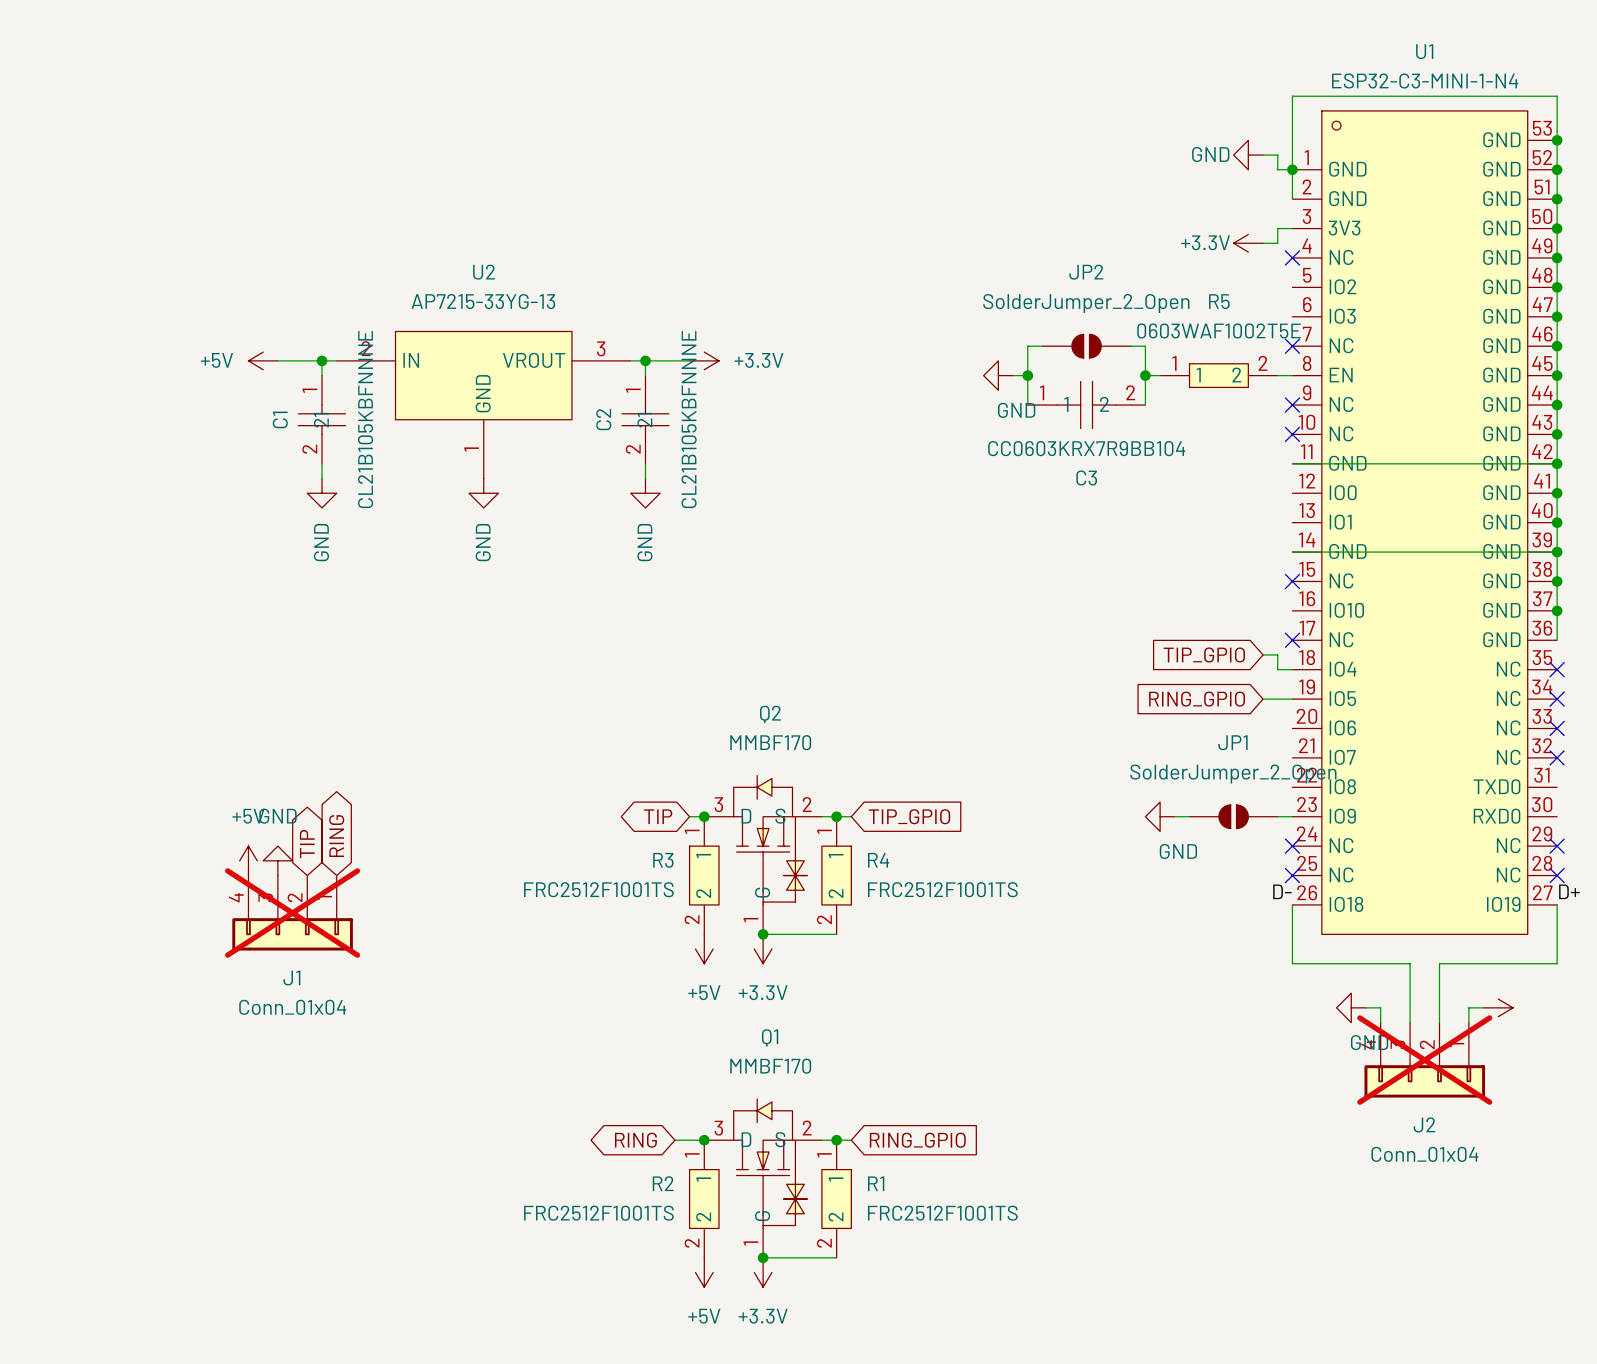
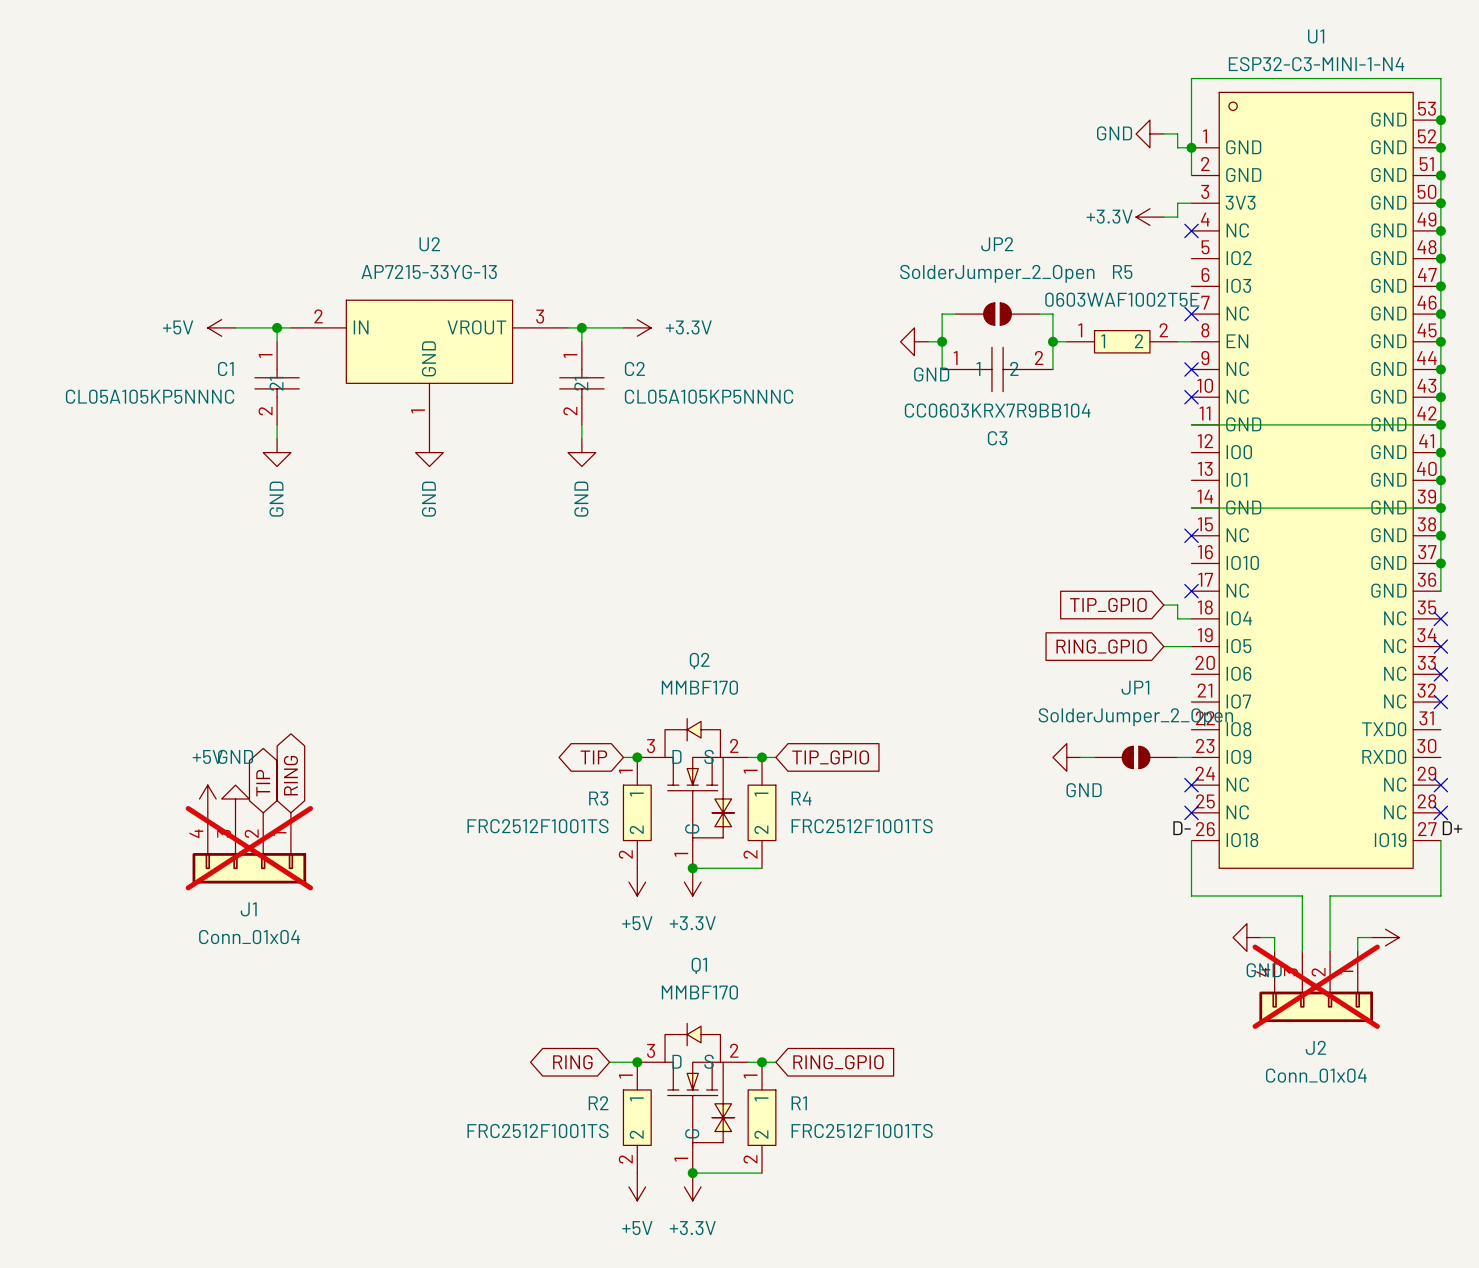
C1 name rotation: 0° (280, 419) -> 90° clockwise (225, 368)
C1 value: CL21B105KBFNNNE (365, 419) -> CL05A105KP5NNNC (150, 396)
C2 name rotation: 0° (603, 419) -> 90° clockwise (634, 368)
C2 name position: C2 (603, 419) -> C2 (634, 368)
C2 value: CL21B105KBFNNNE (689, 419) -> CL05A105KP5NNNC (709, 396)

